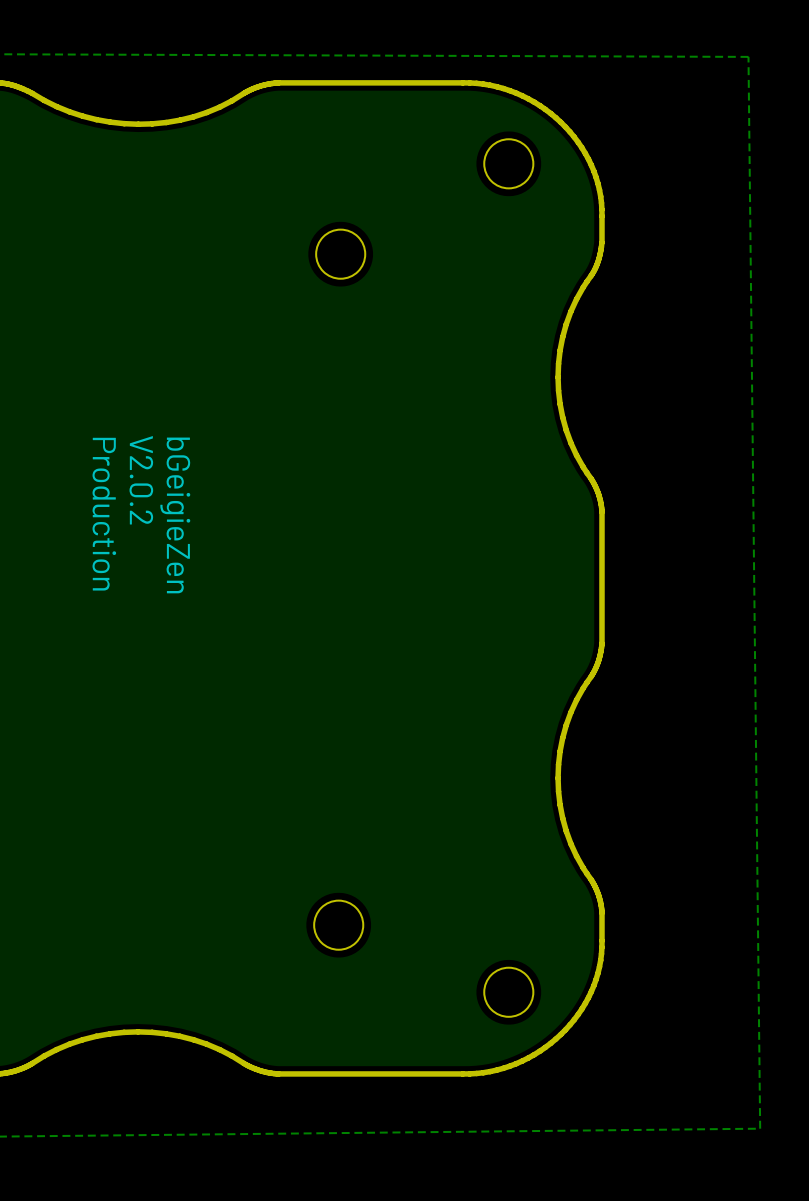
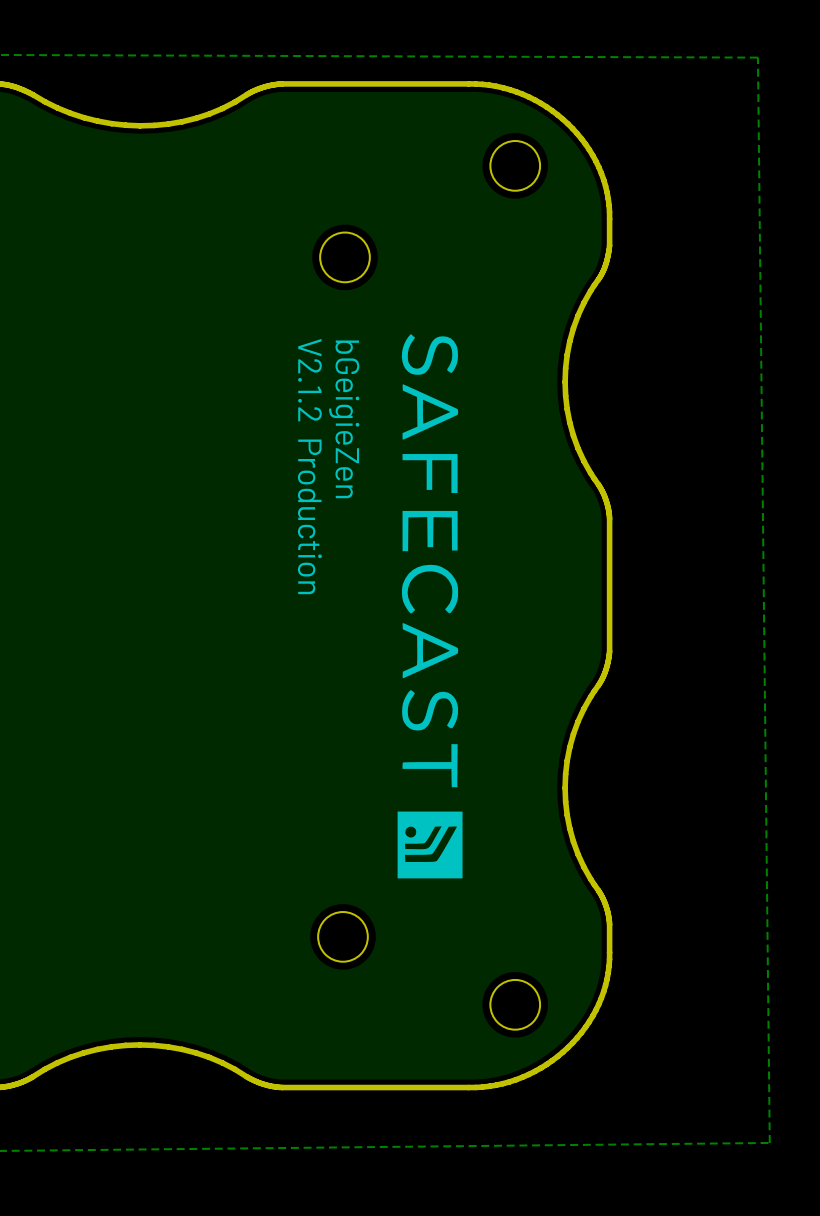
drawing: none -> [397, 334, 463, 879]
text: none -> V2.1.2 Production (309, 466)
text: V2.0.2 (141, 480) -> none
text: Production (104, 514) -> none
text position: bGeigieZen (175, 515) -> bGeigieZen (344, 419)

